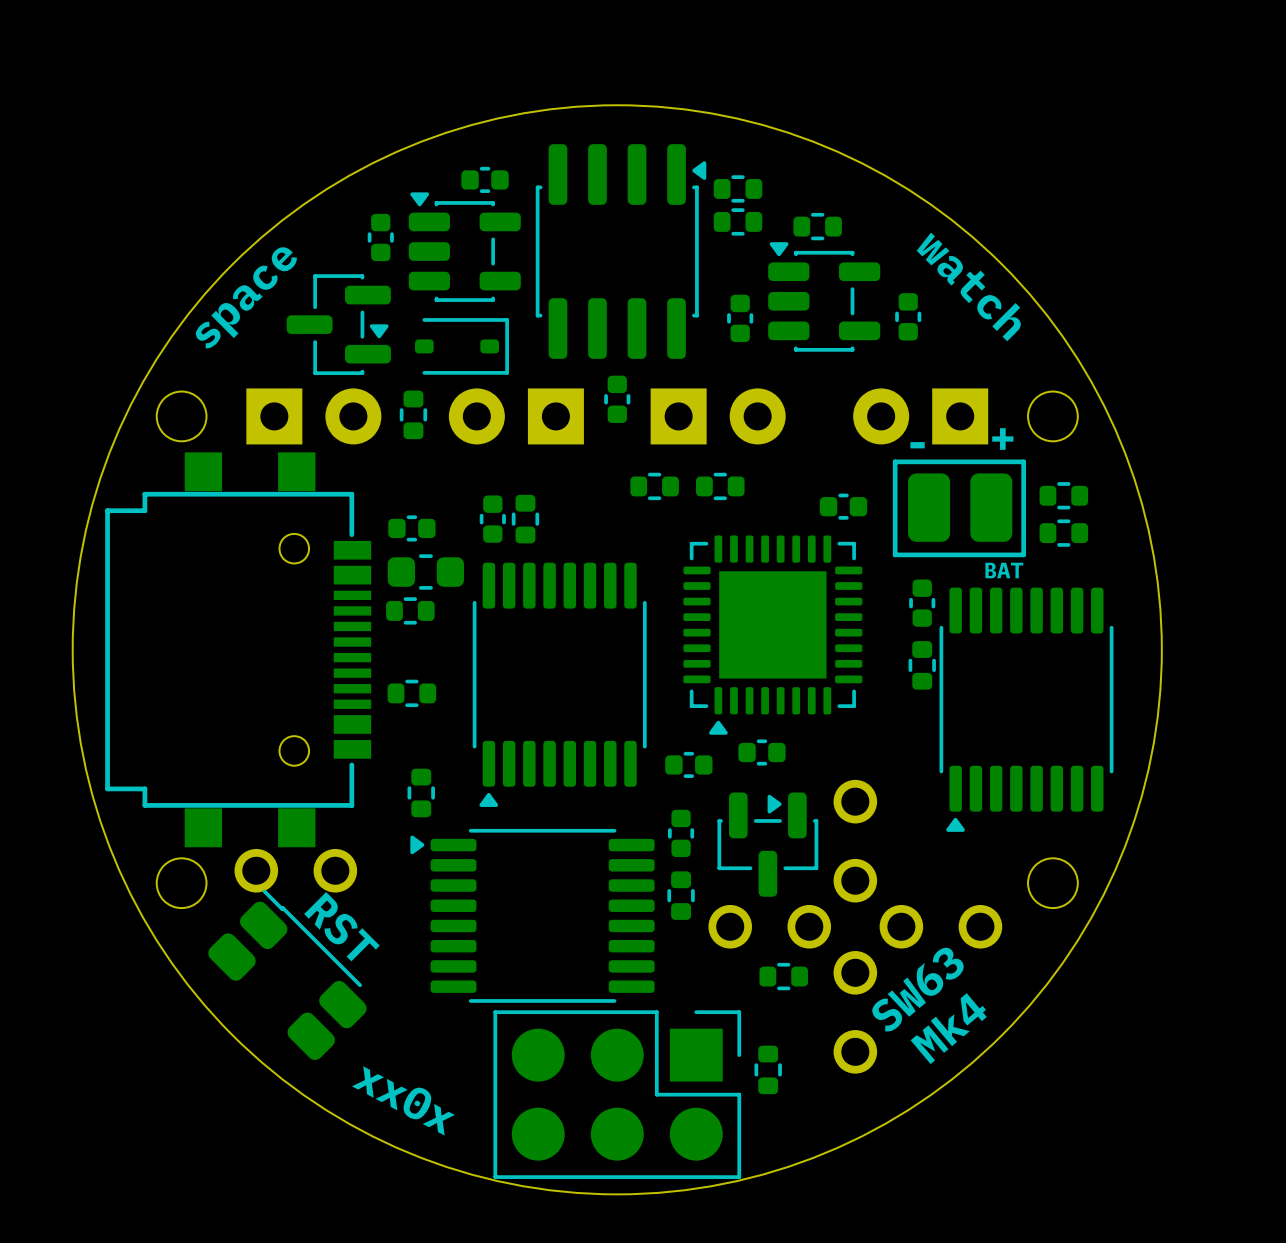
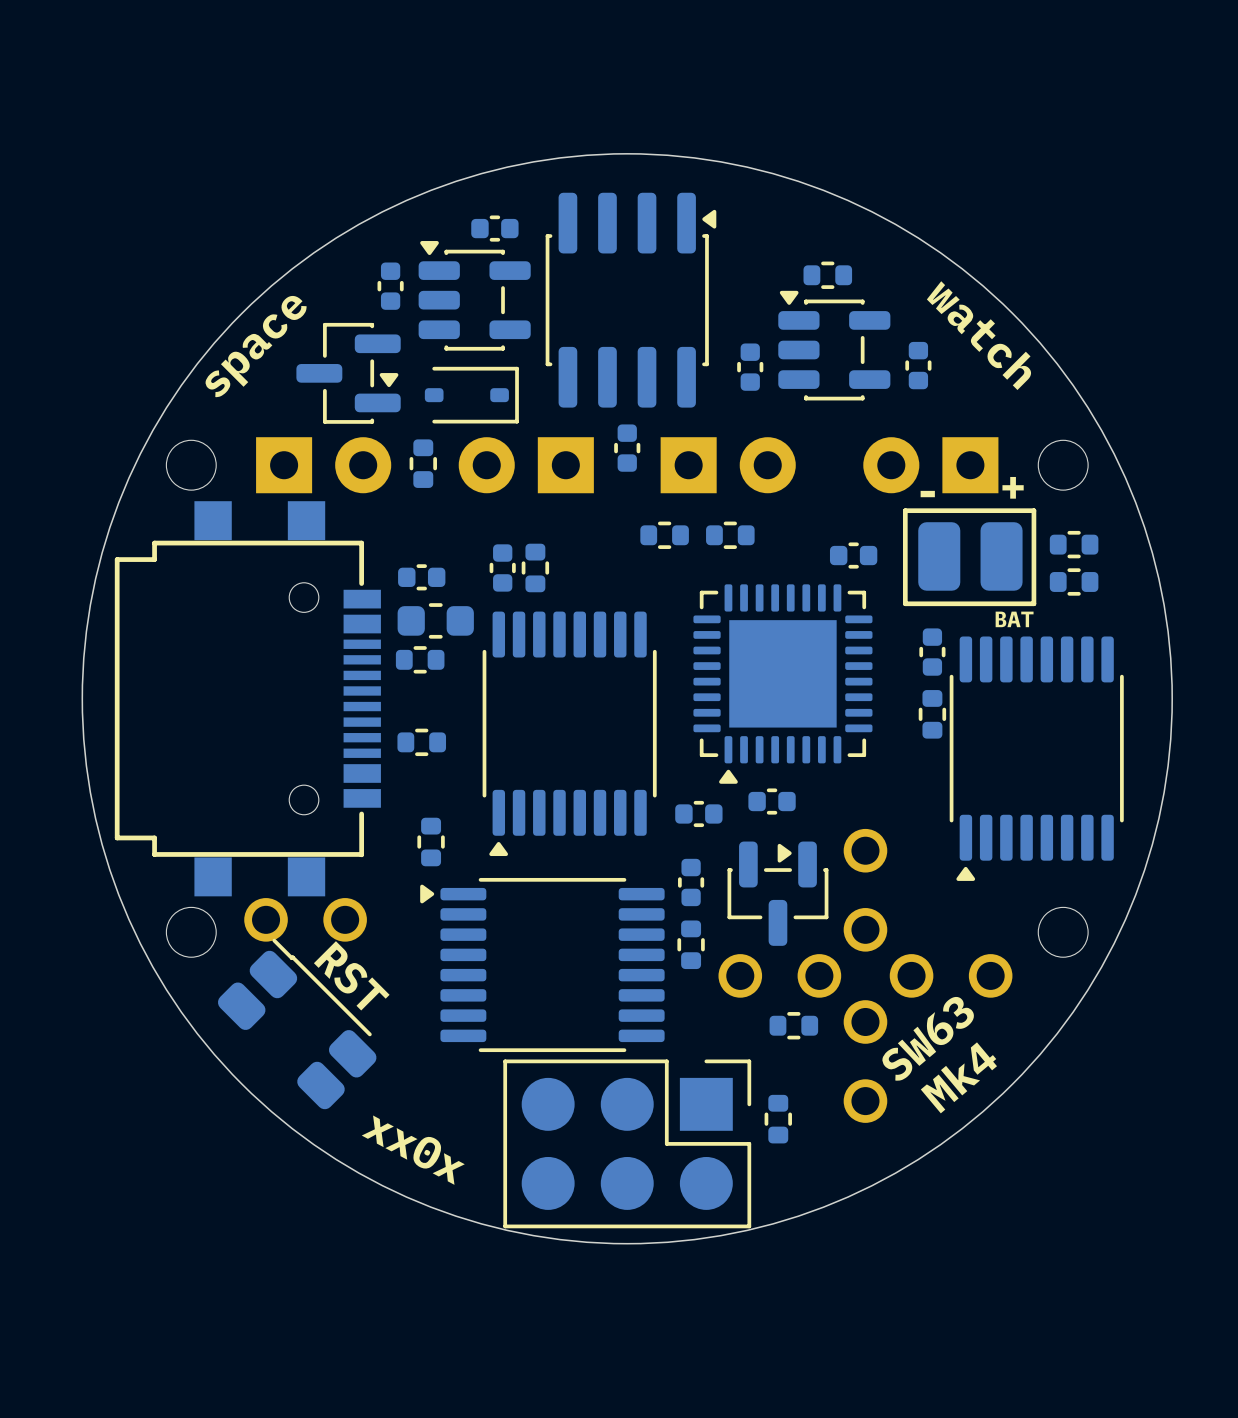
part: (738, 188) -> none
part: (738, 221) -> none

